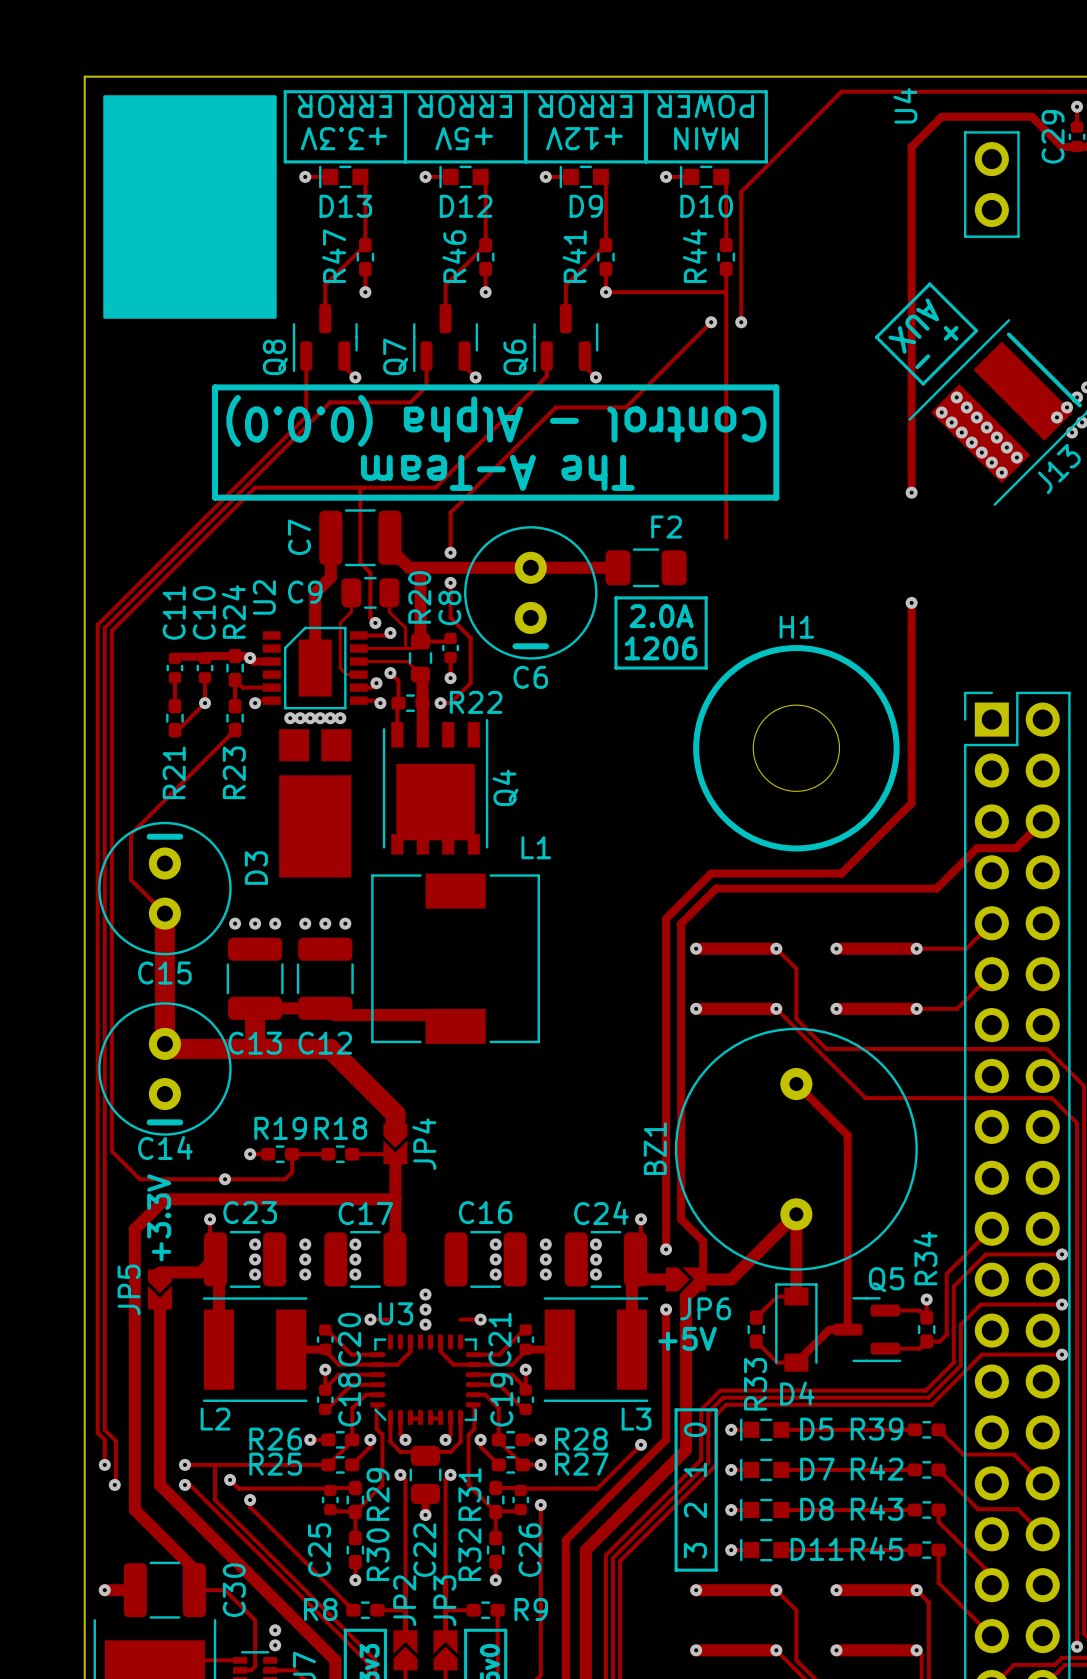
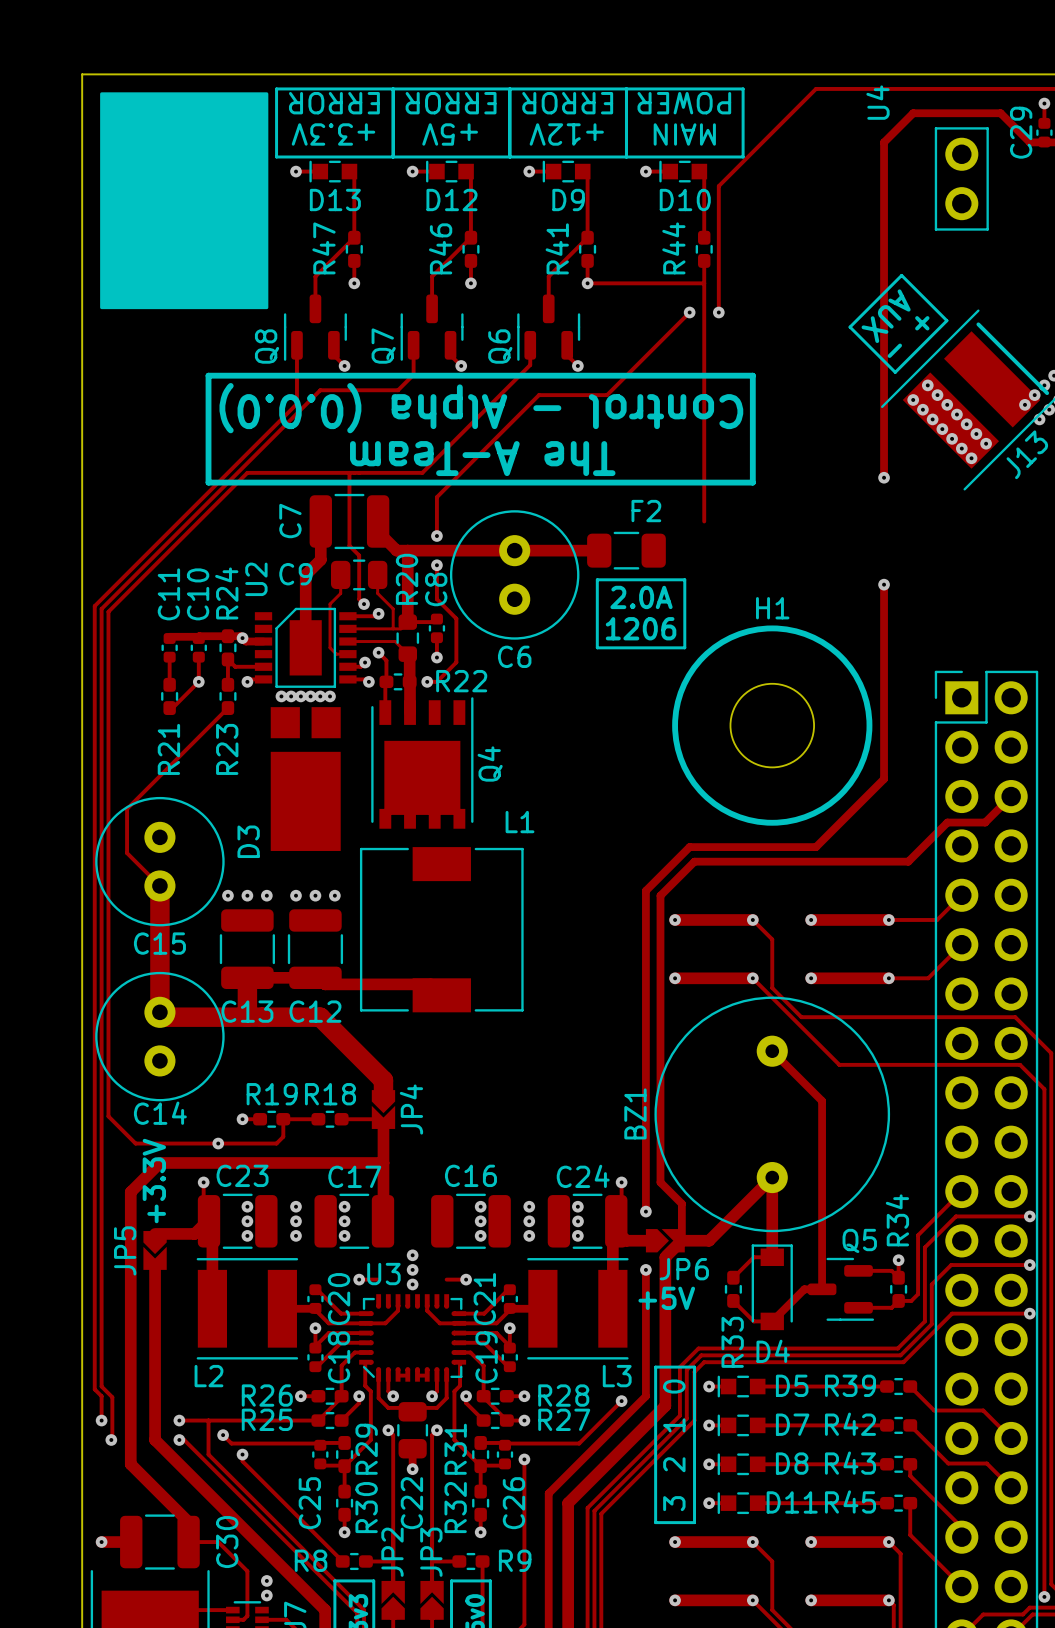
text: - (530, 646) -> none
text: - (164, 836) -> none
text: - (164, 1122) -> none

